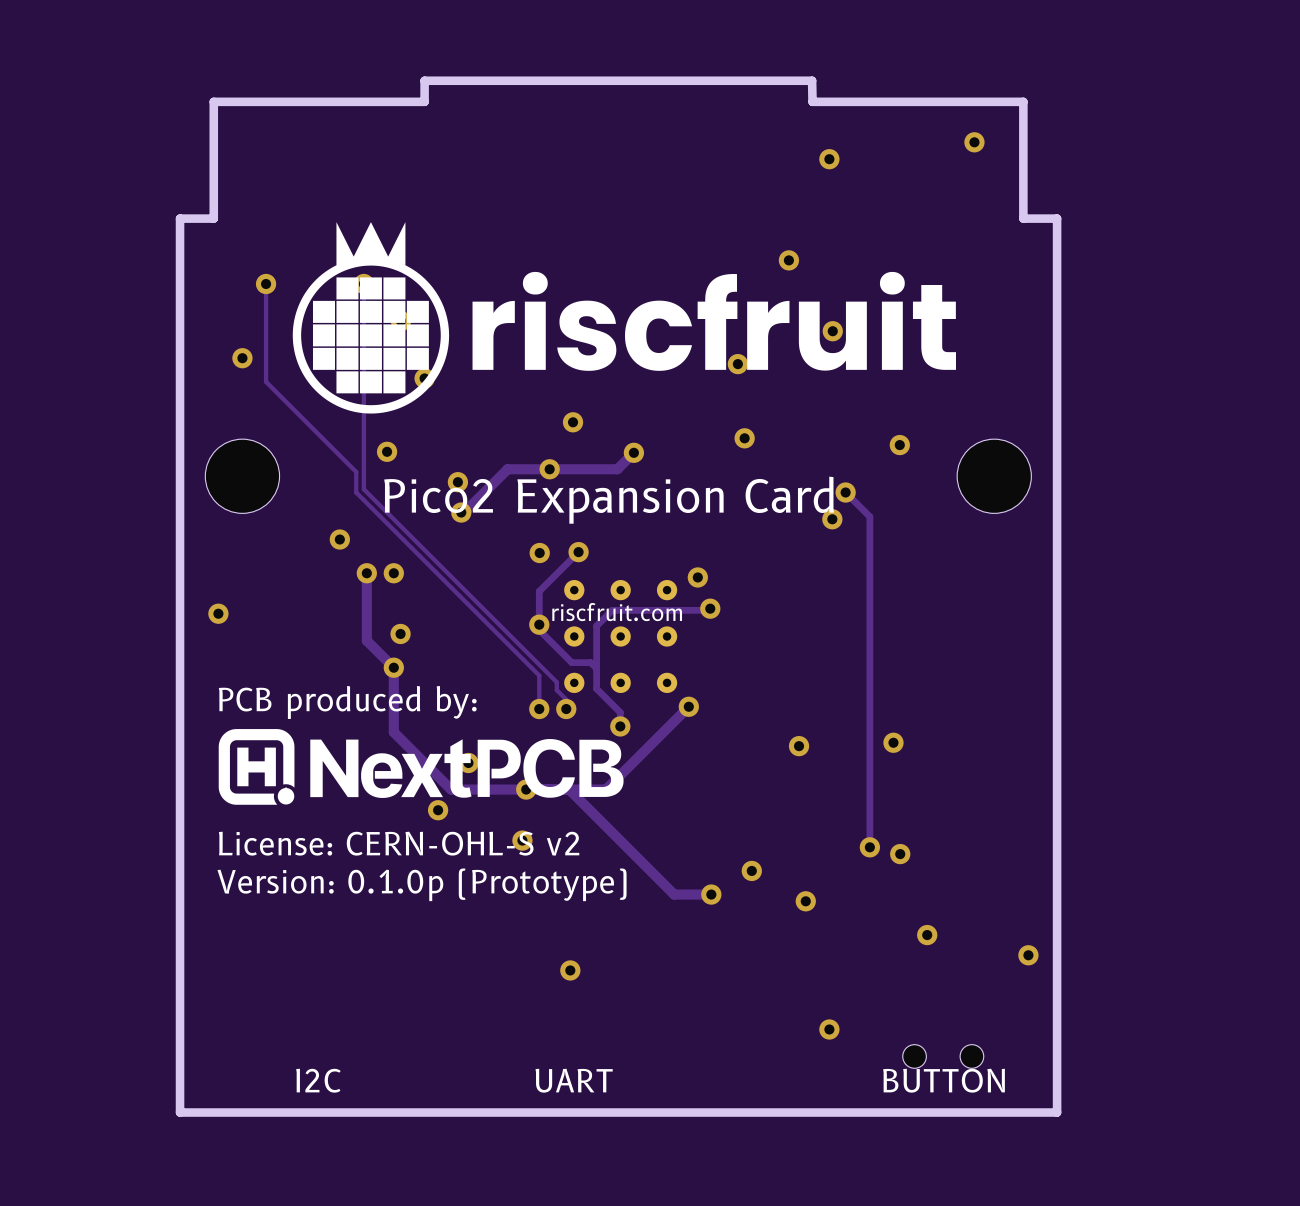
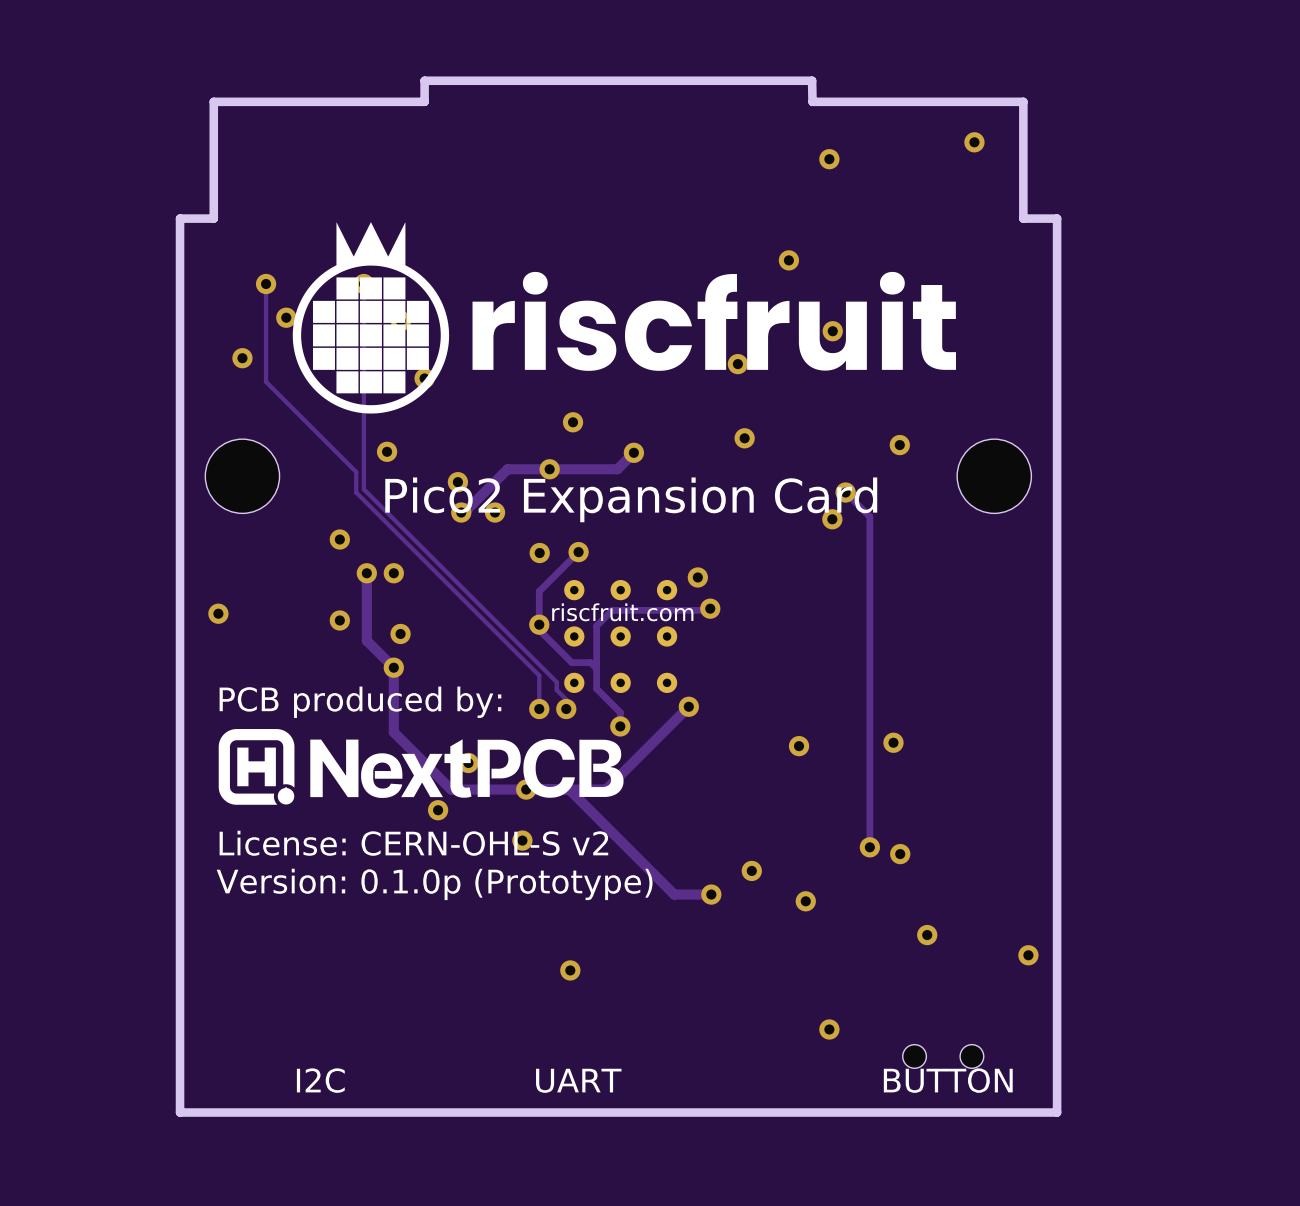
via: none -> (286, 317)
via: none -> (495, 512)
via: none -> (339, 620)

